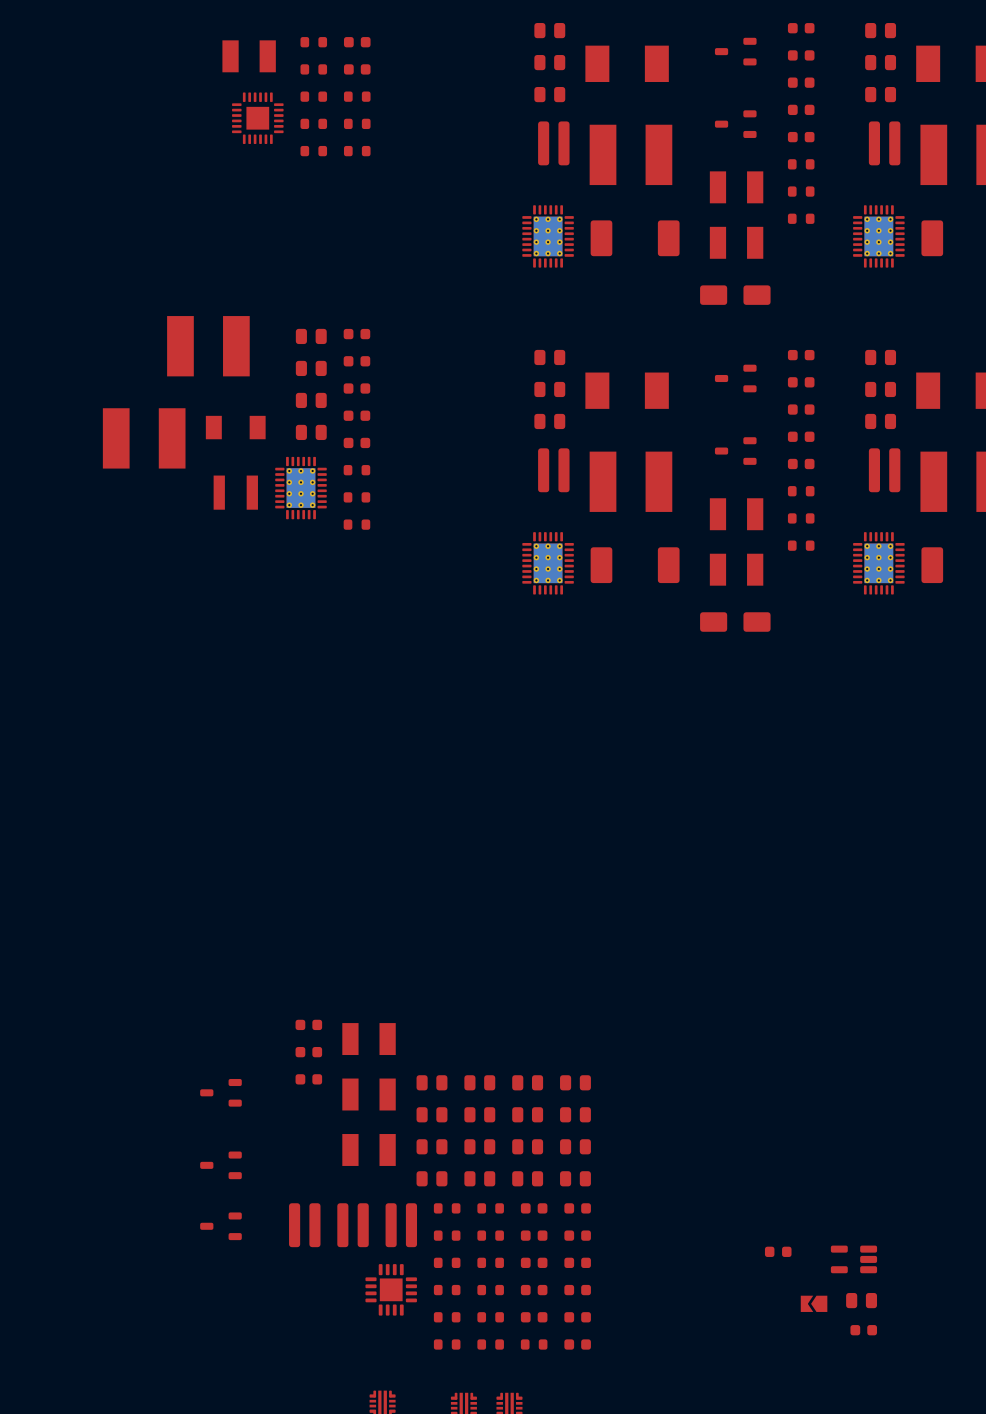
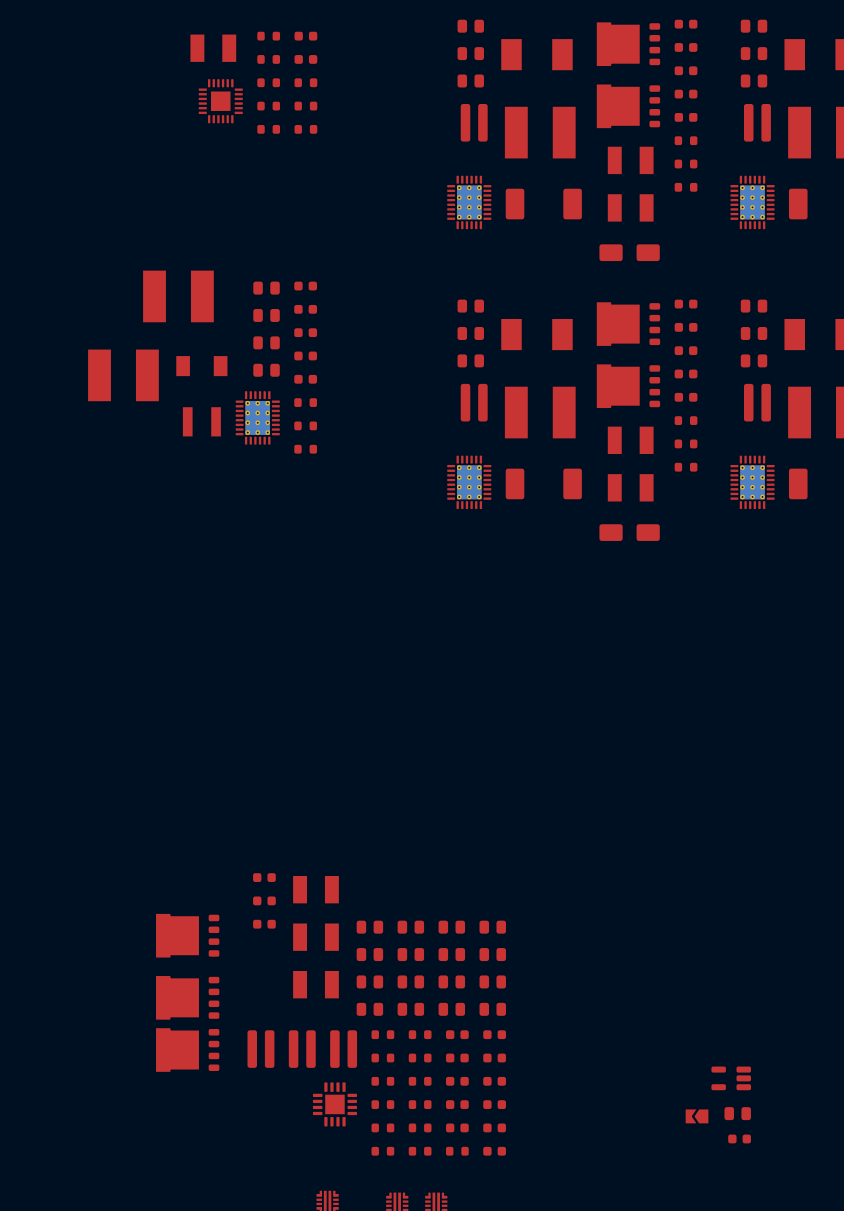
part footprint: [714, 37, 757, 66] -> [596, 22, 661, 67]
part footprint: [714, 110, 757, 138] -> [596, 84, 661, 129]
part footprint: [714, 364, 757, 393] -> [596, 302, 661, 346]
part footprint: [714, 437, 757, 465] -> [596, 364, 661, 409]
part footprint: [200, 1078, 242, 1107] -> [156, 913, 220, 958]
part footprint: [200, 1151, 242, 1180] -> [156, 976, 220, 1020]
part footprint: [200, 1212, 242, 1241] -> [156, 1028, 220, 1072]
part: (778, 1251) -> none

